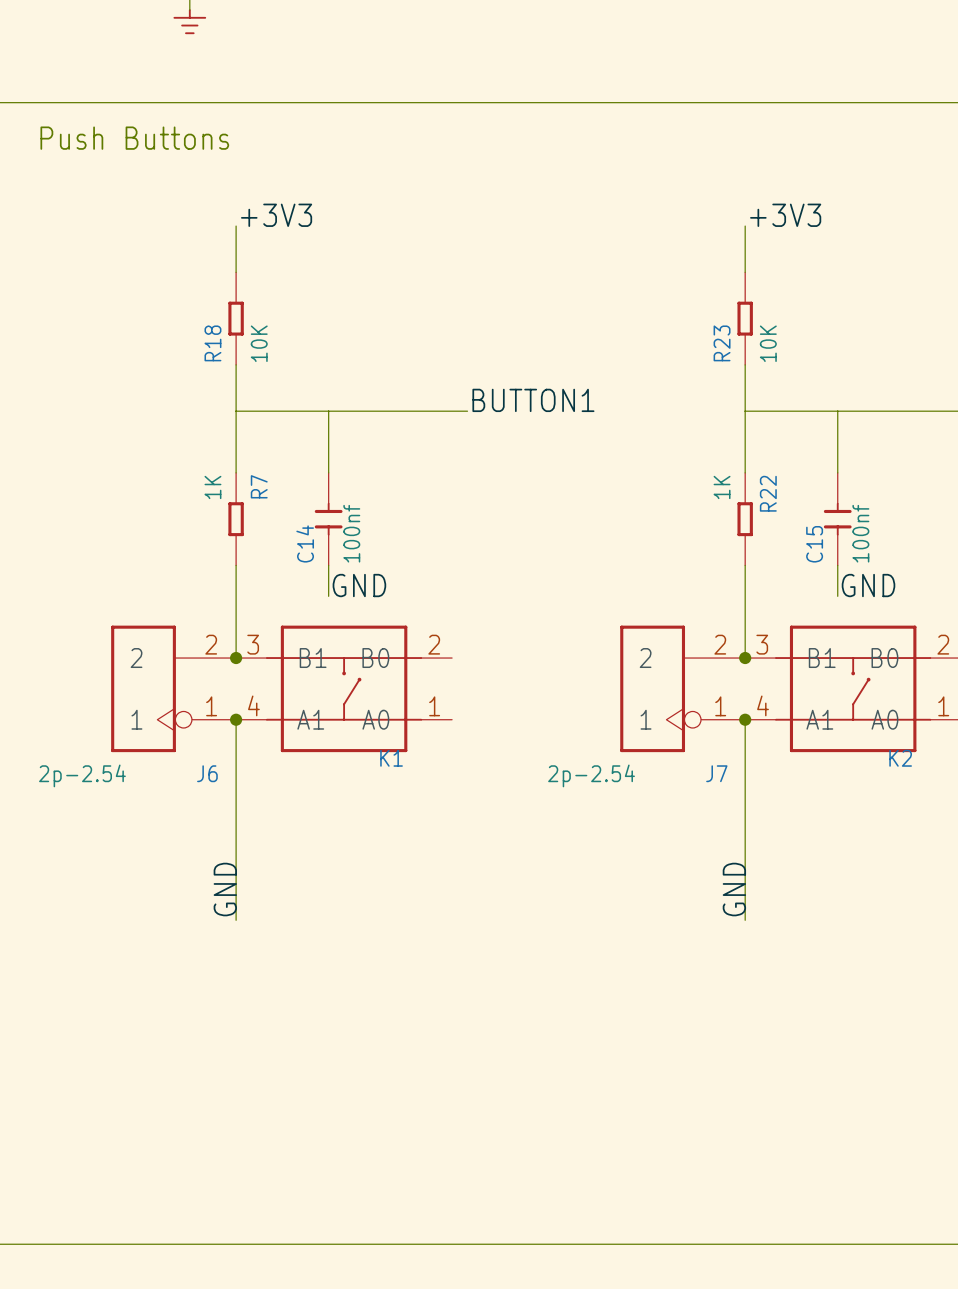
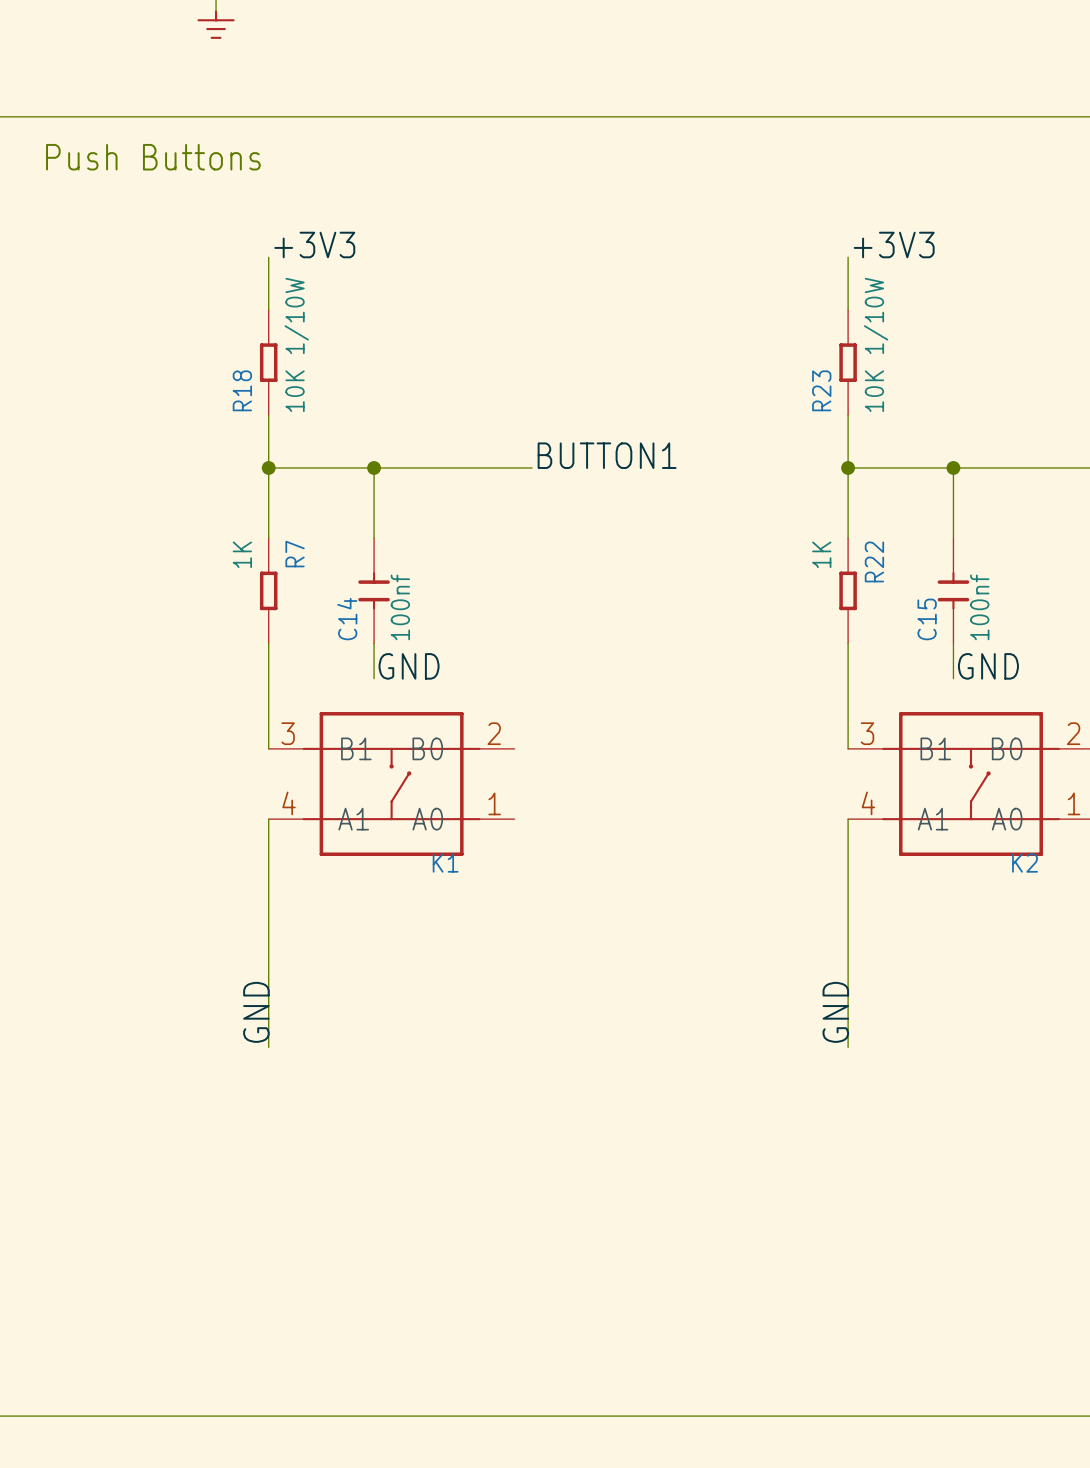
R18 value: 10K (259, 343) -> 10K 1/10W (296, 344)
R23 value: 10K (768, 343) -> 10K 1/10W (876, 344)
junction: none -> (268, 467)
junction: none -> (374, 467)
junction: none -> (848, 467)
junction: none -> (953, 467)
junction: (236, 658) -> none
junction: (745, 658) -> none
J6: 2p-2.54 (173, 688) -> none
J7: 2p-2.54 (682, 688) -> none
junction: (236, 719) -> none
junction: (745, 719) -> none

